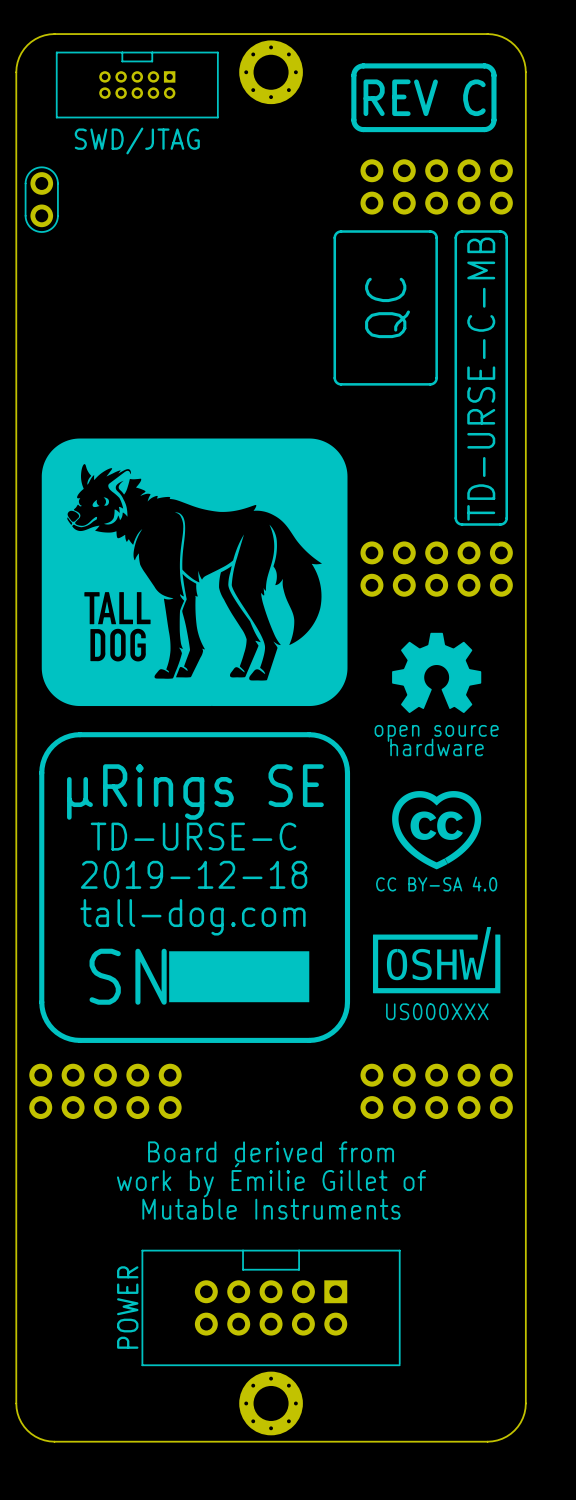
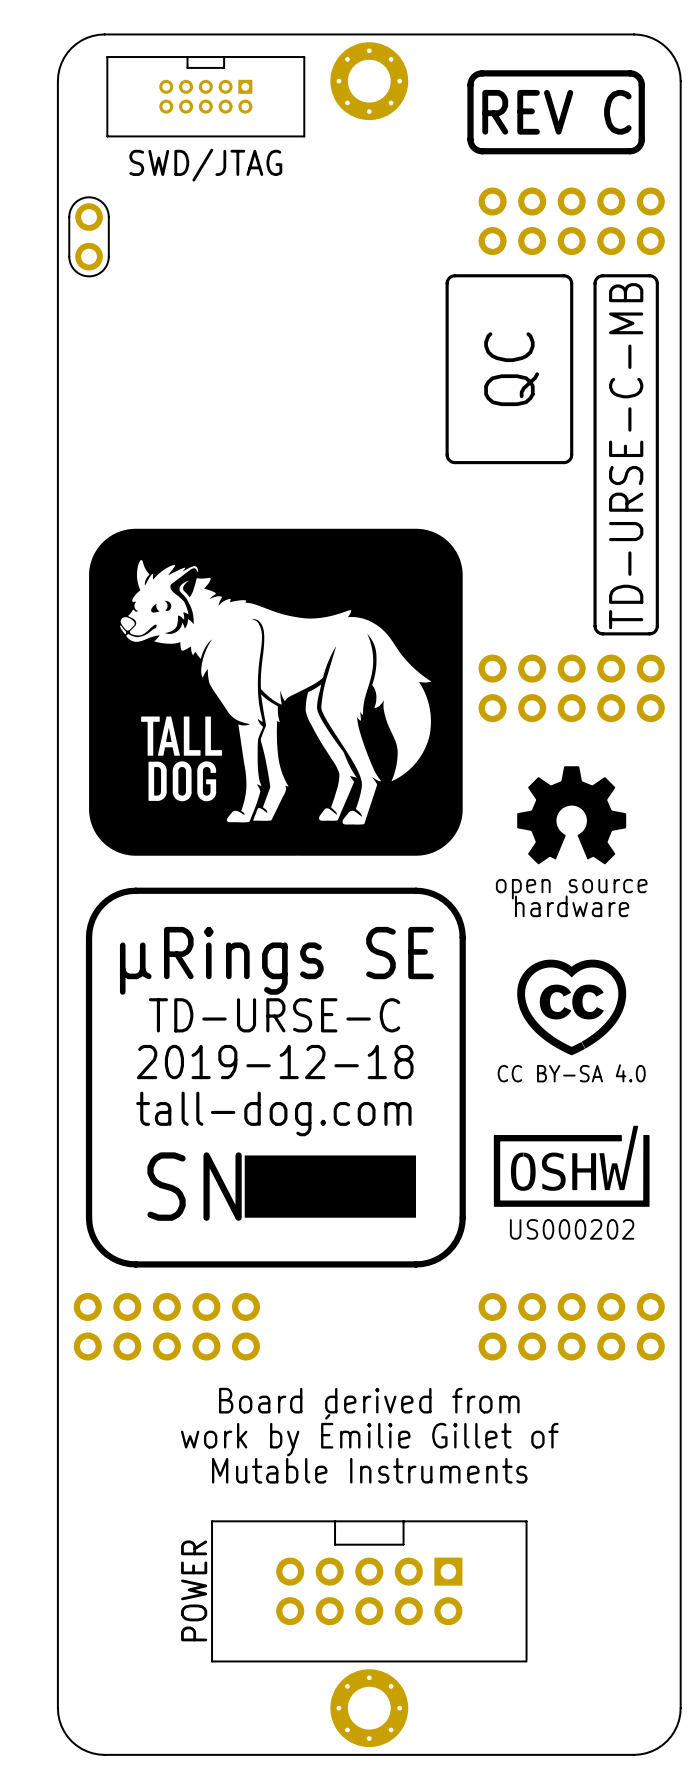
drawing shape: [372, 926, 501, 1021] -> [493, 1125, 650, 1240]

